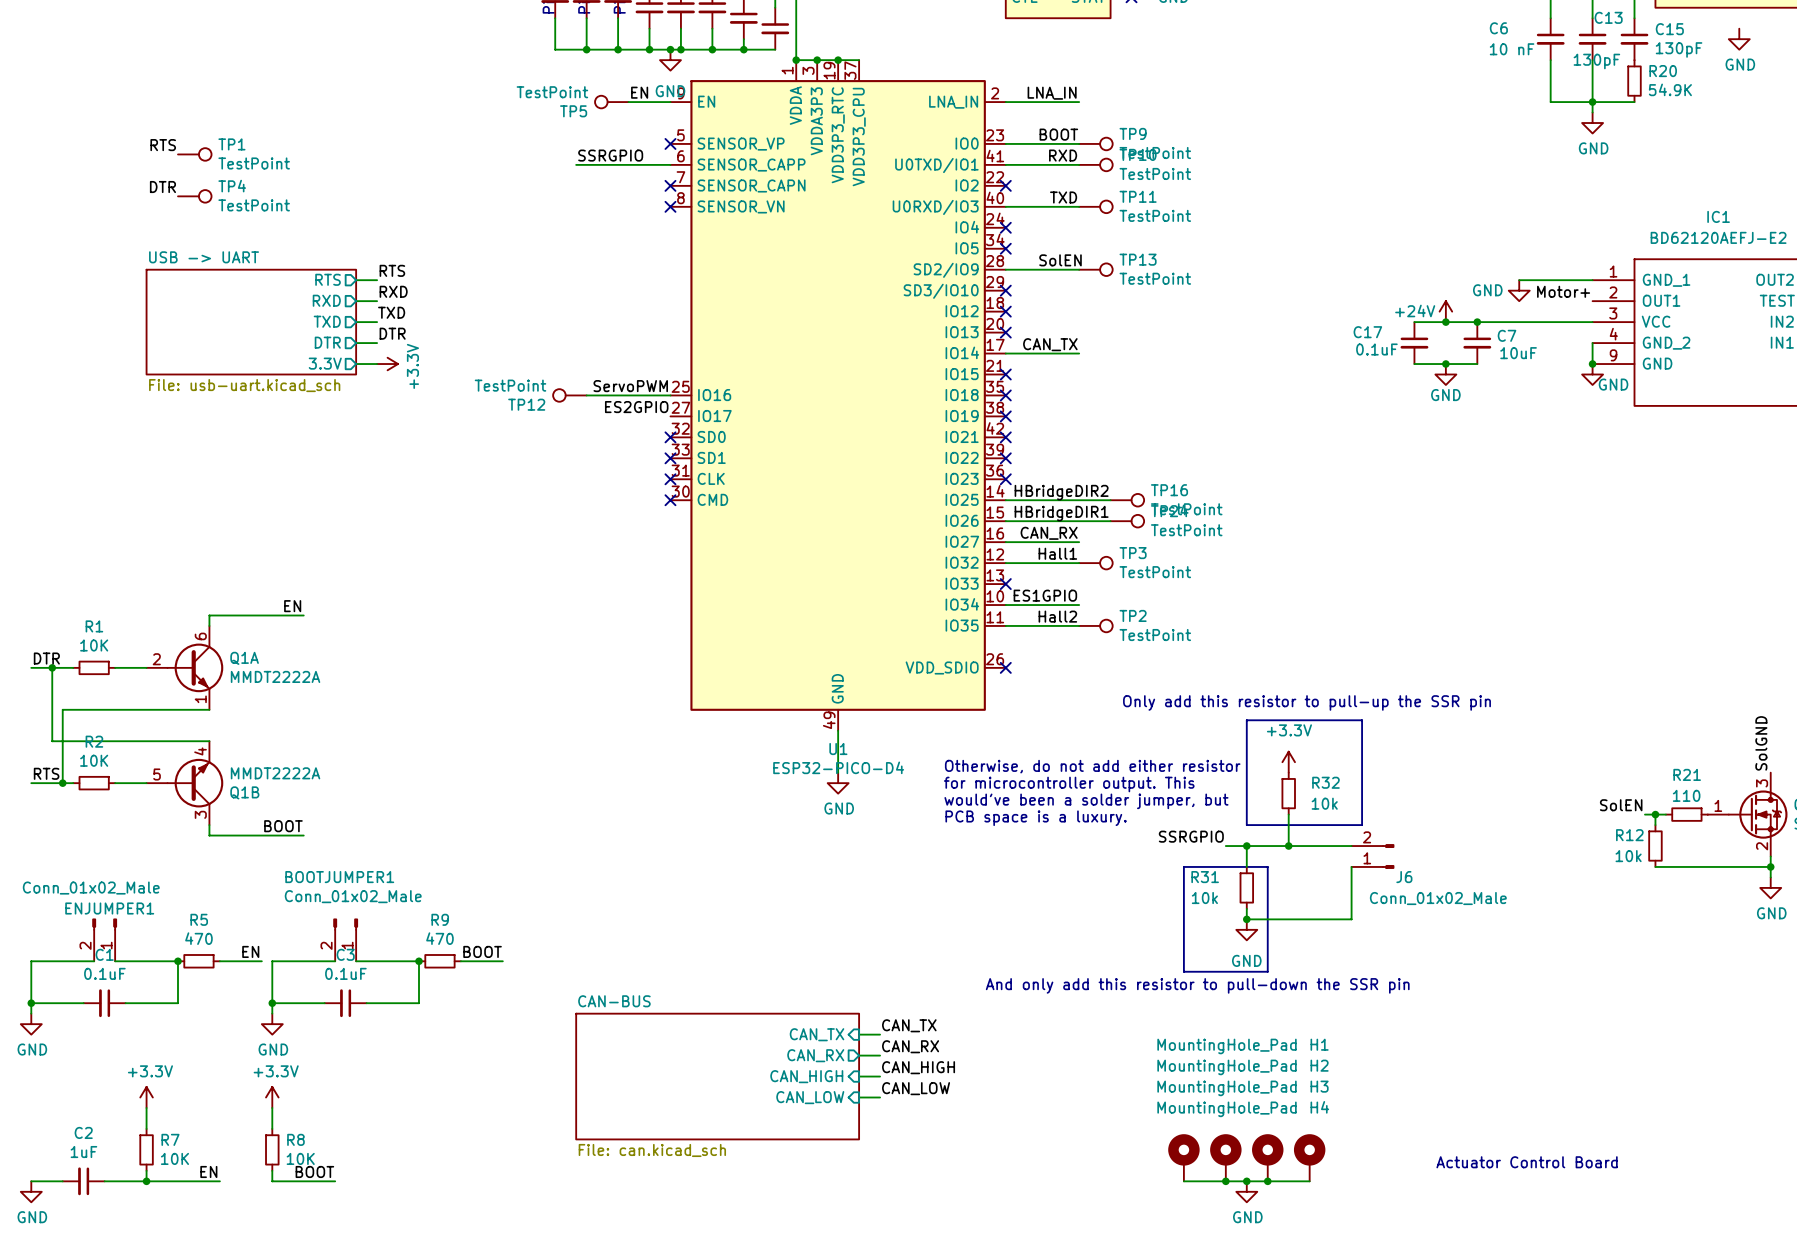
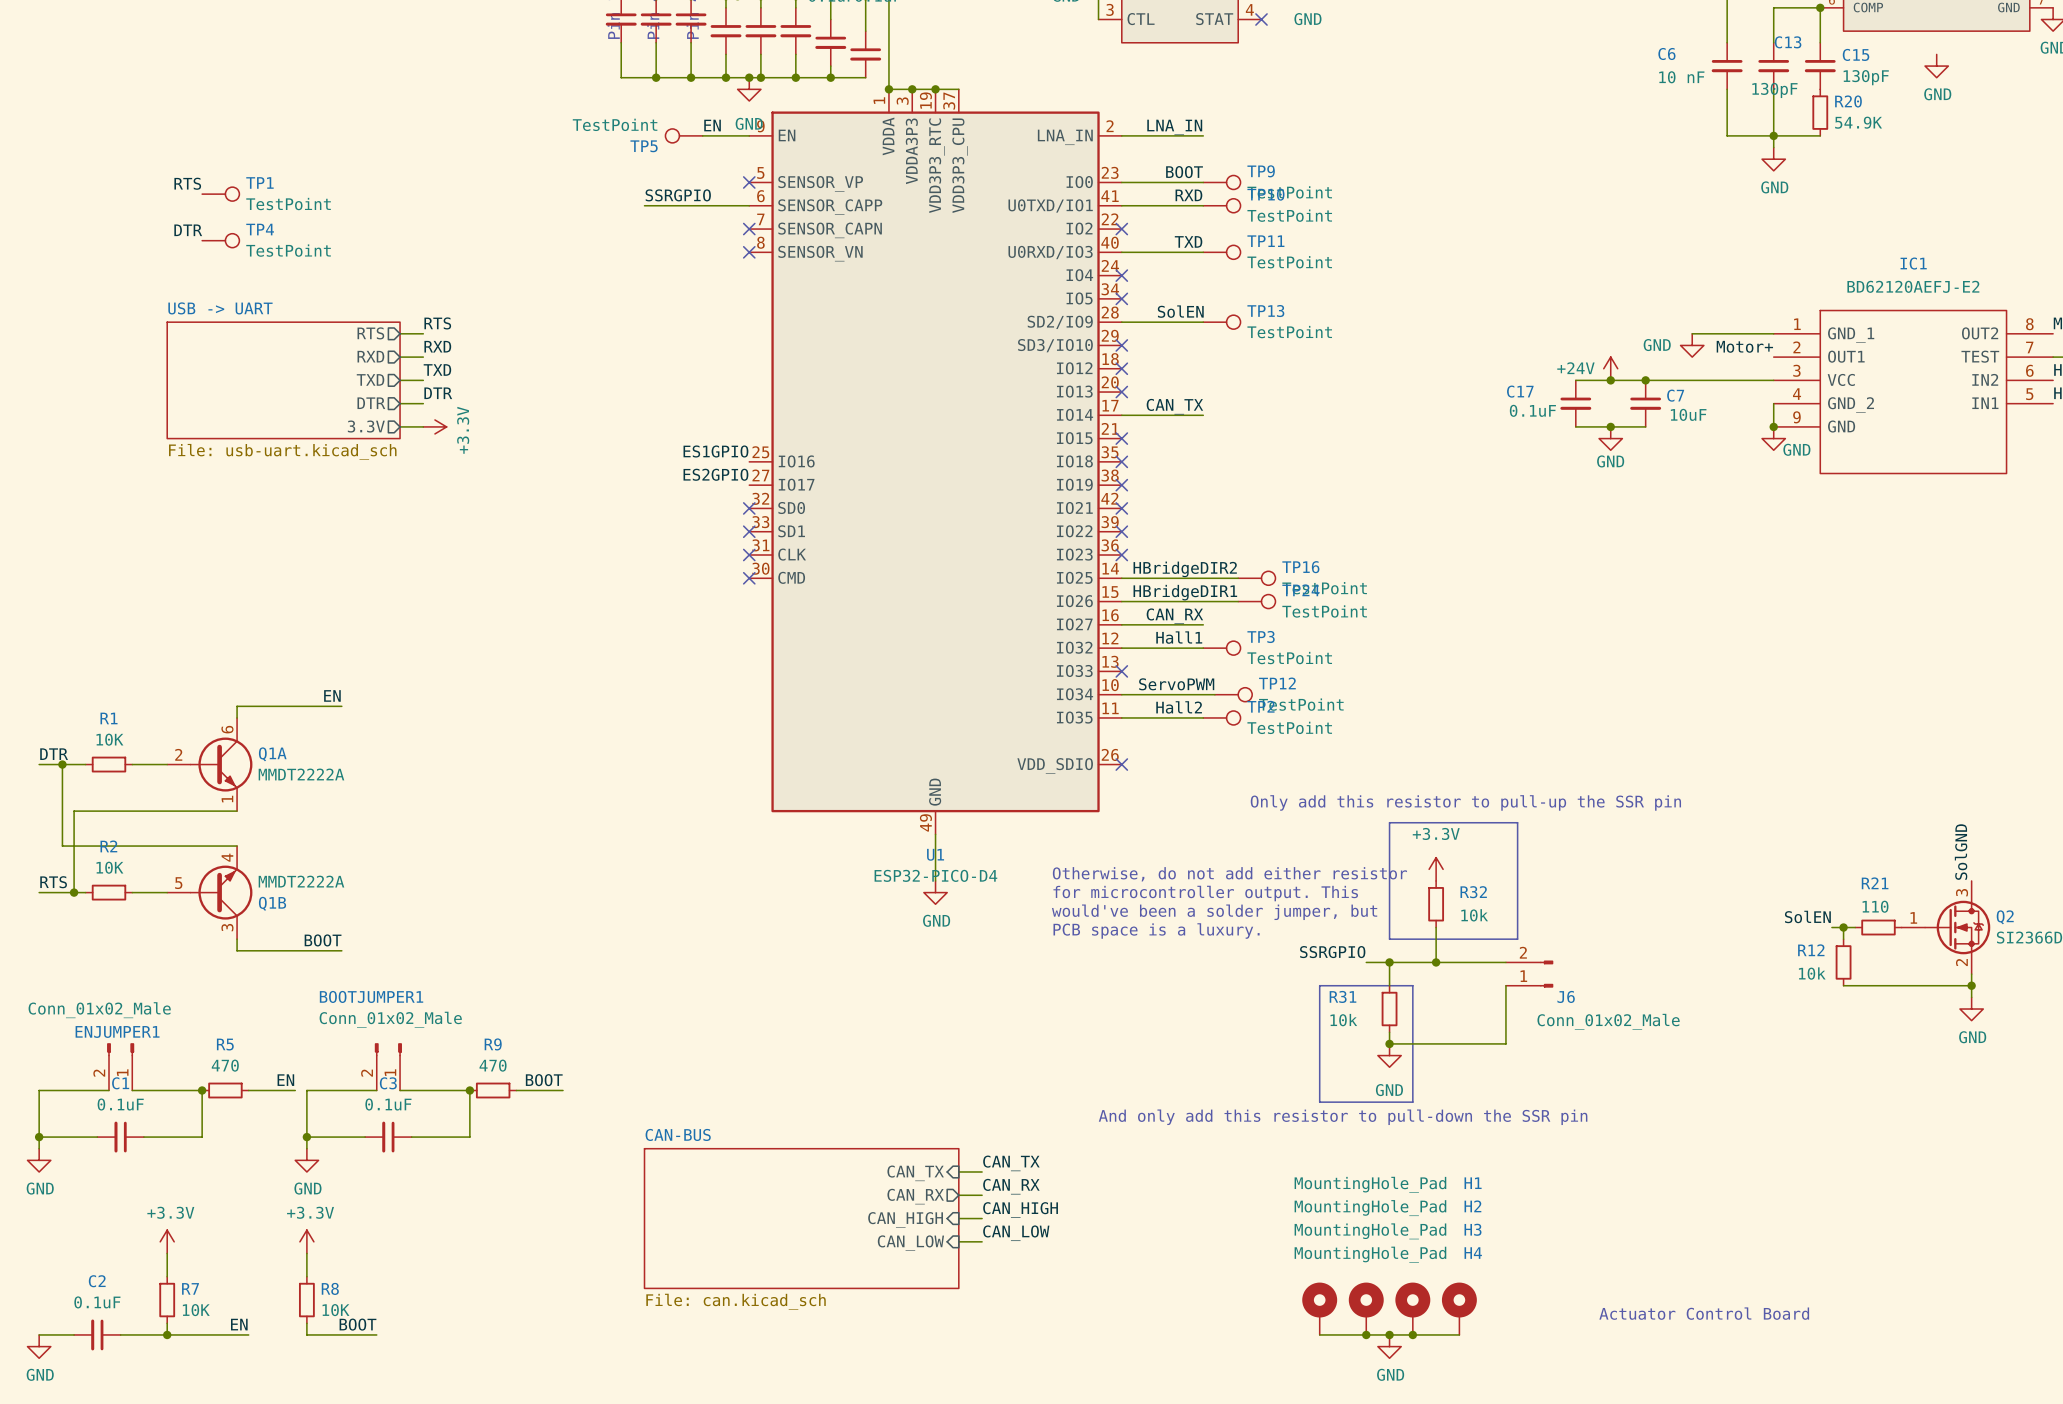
label: ServoPWM (630, 386) -> ES1GPIO (715, 451)
TP12 rotation: 0° (559, 395) -> 180° (1245, 694)
TP12 position: (569, 395) -> (1233, 694)
wire: (586, 395) (670, 395) -> none
label: ES1GPIO (1045, 595) -> none
label: none -> ServoPWM (1176, 684)
wire: none -> (1203, 694) (1214, 694)
C2 value: 1uF (83, 1152) -> 0.1uF (97, 1302)

